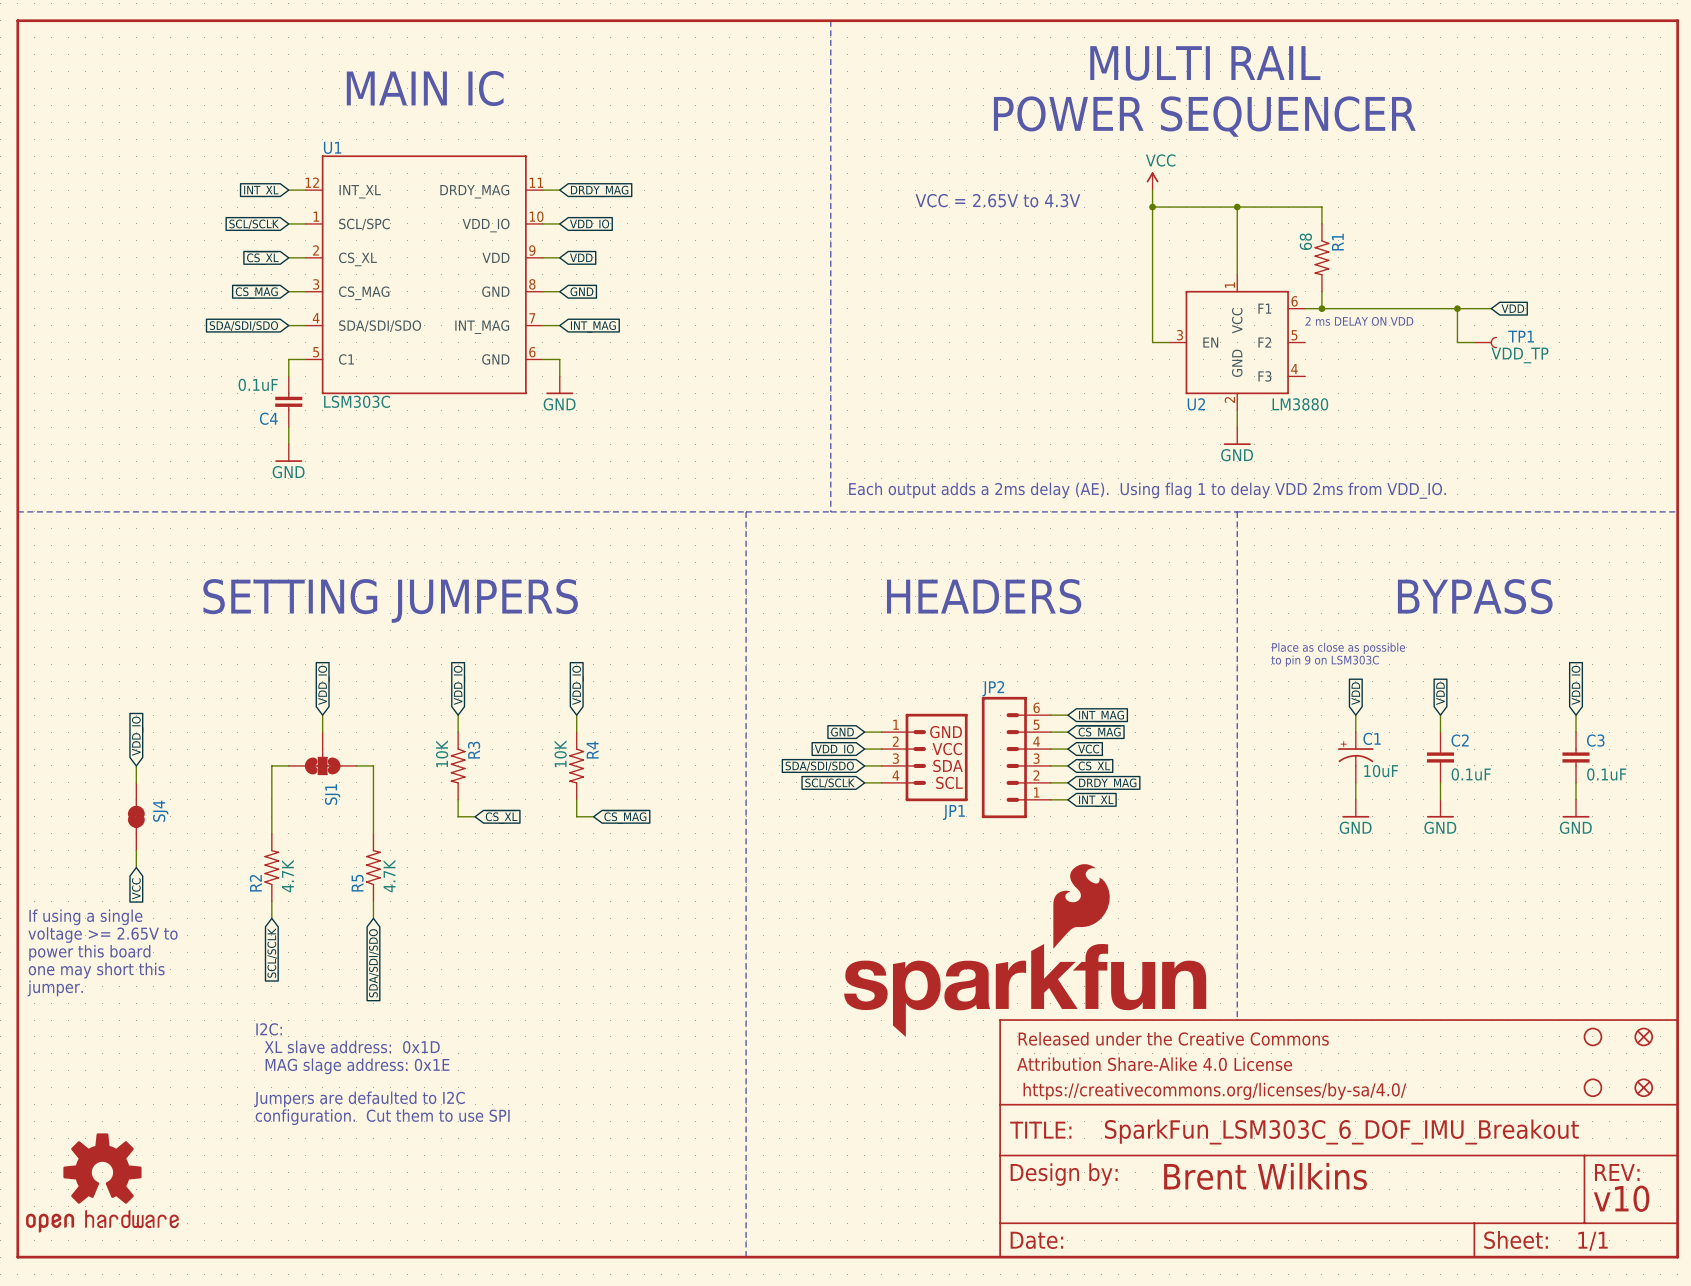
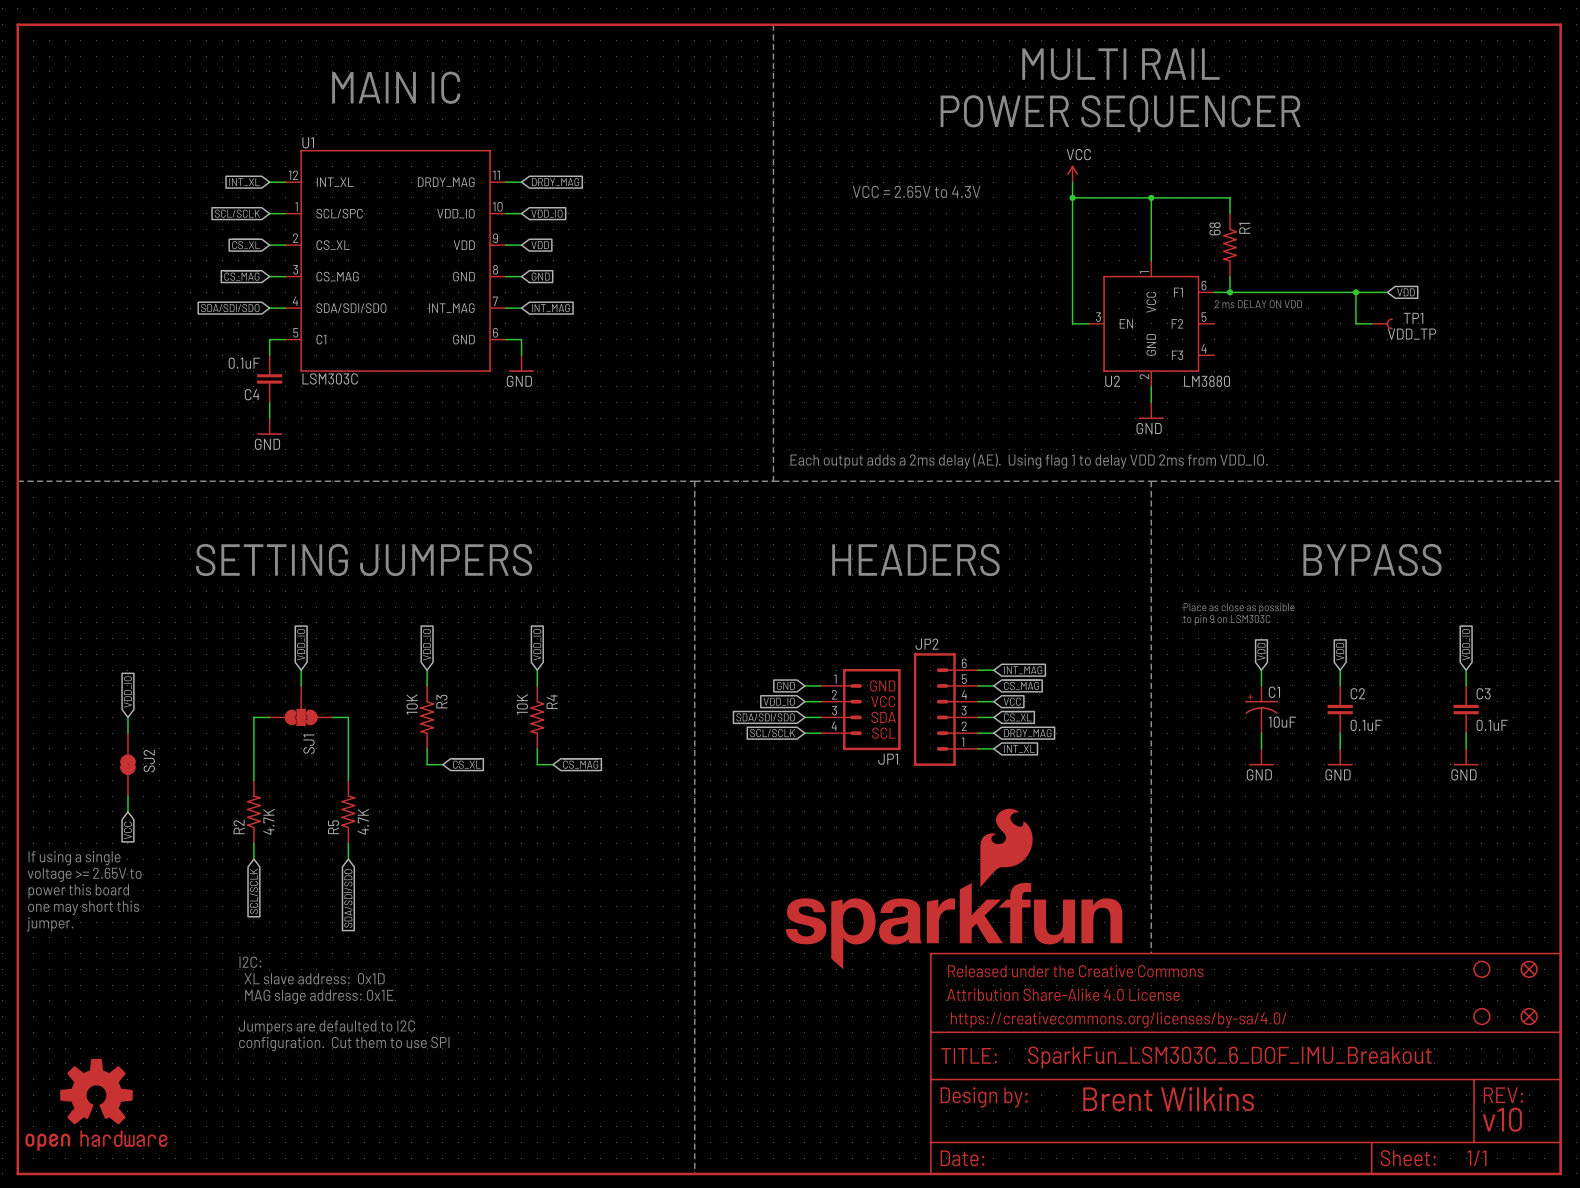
SJ4 name: SJ4 (160, 811) -> SJ2 (149, 760)

